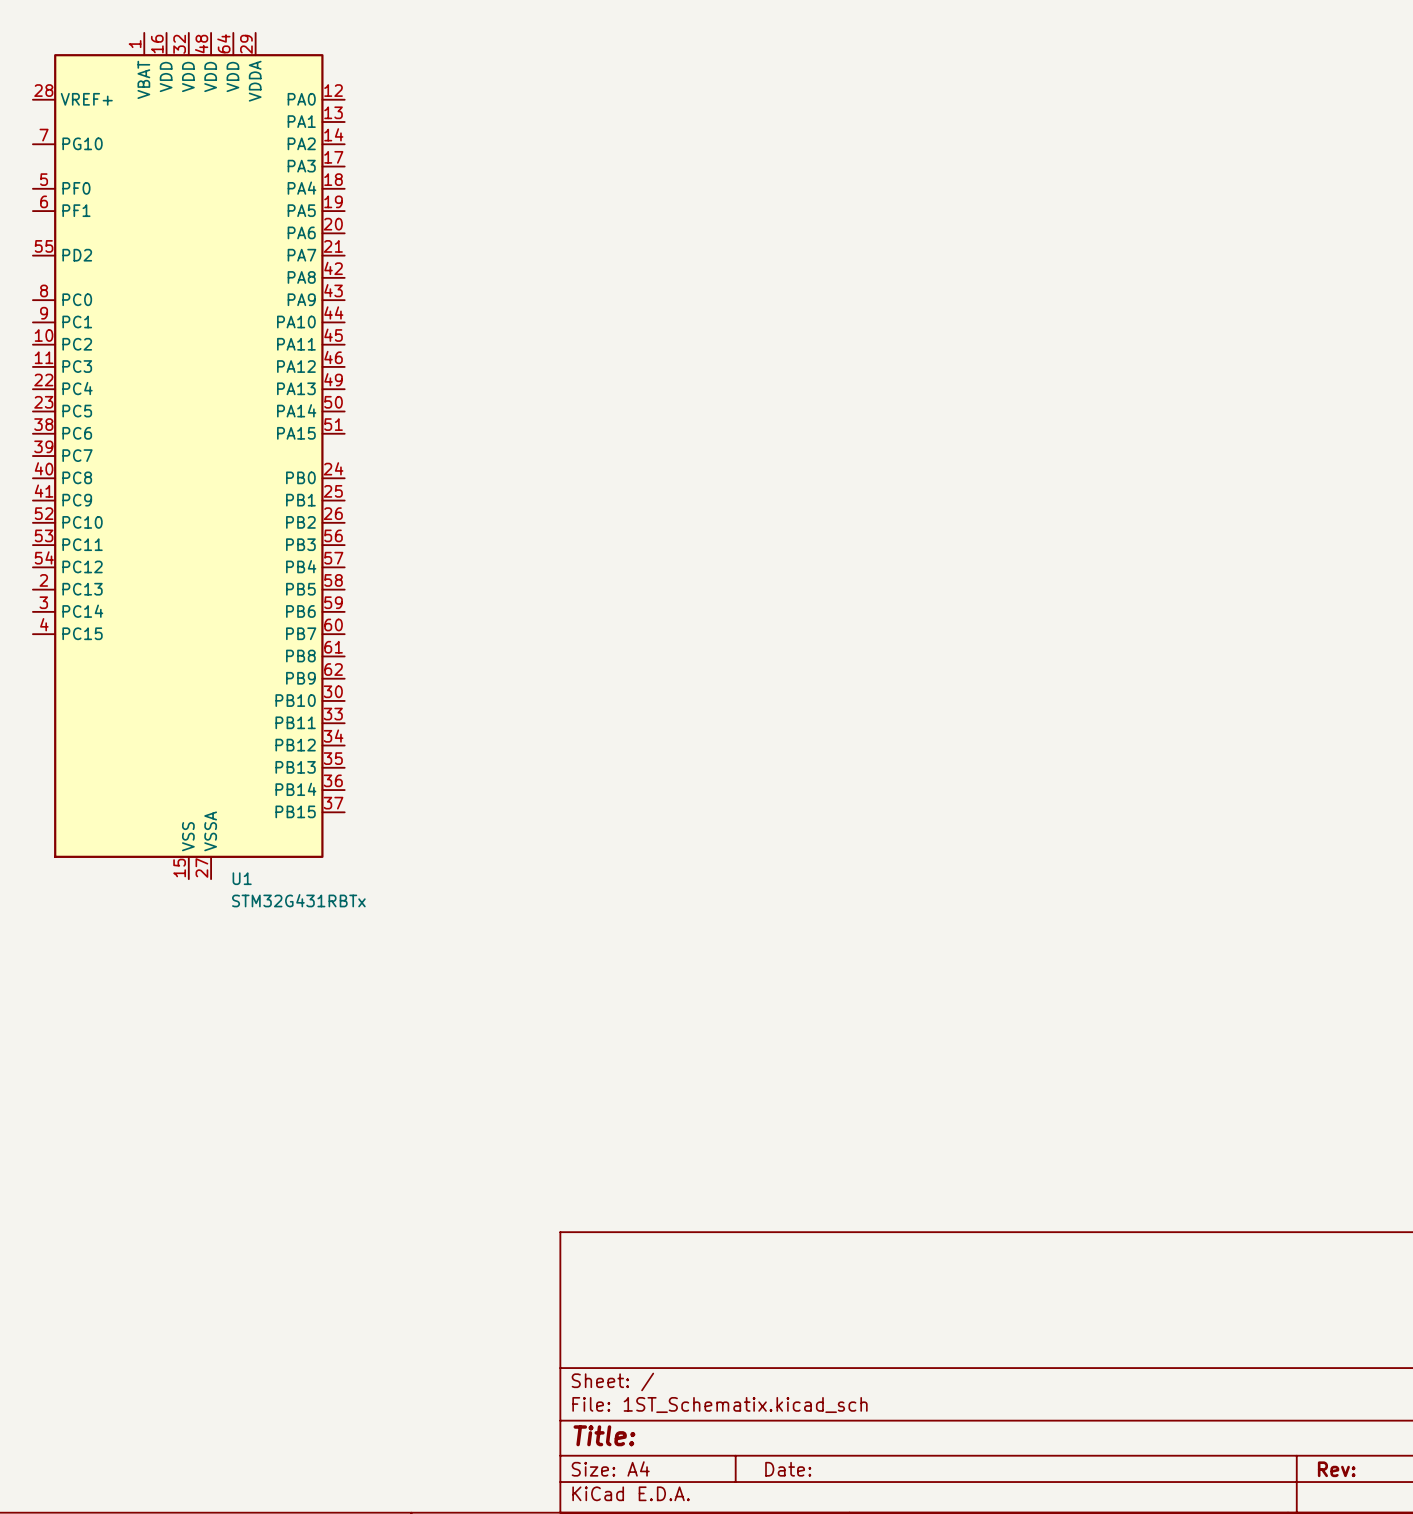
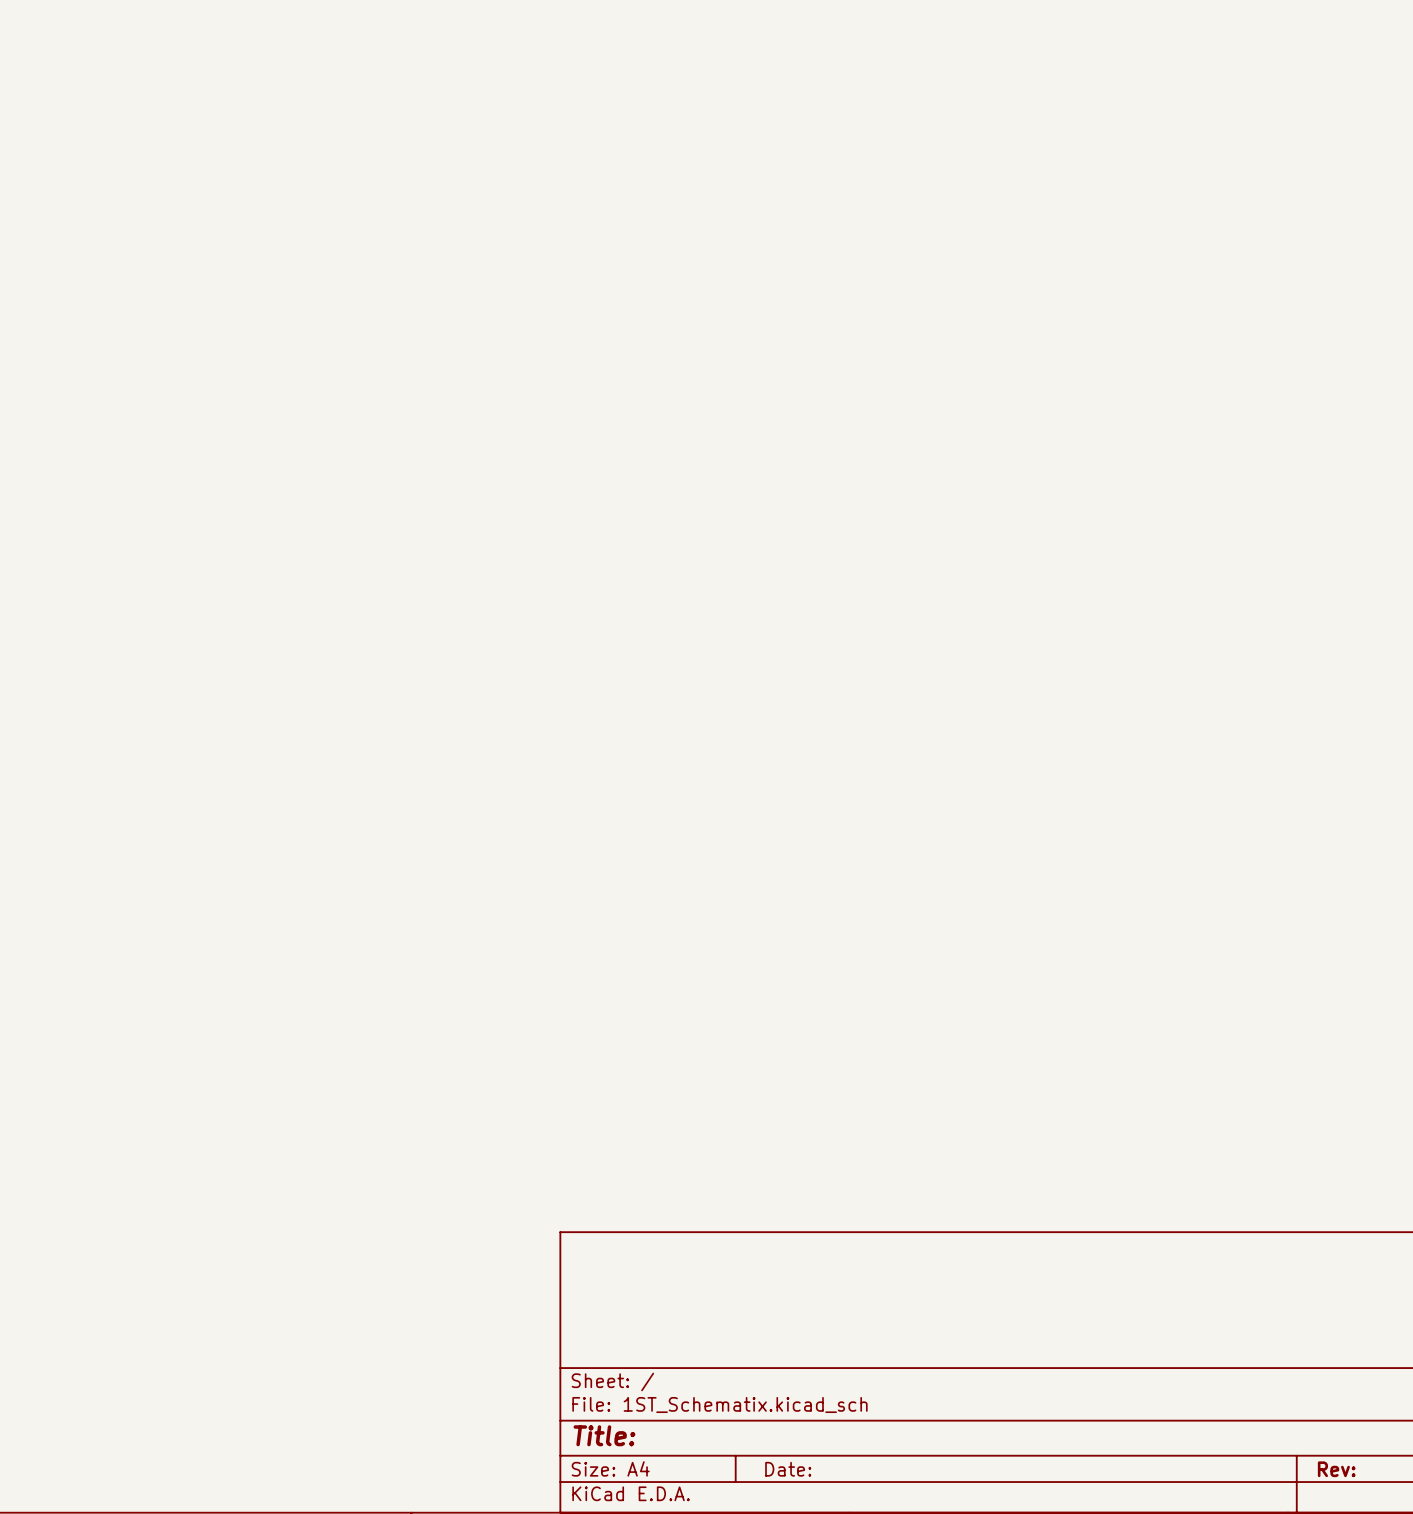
U1: STM32G431RBTx (188, 456) -> none

